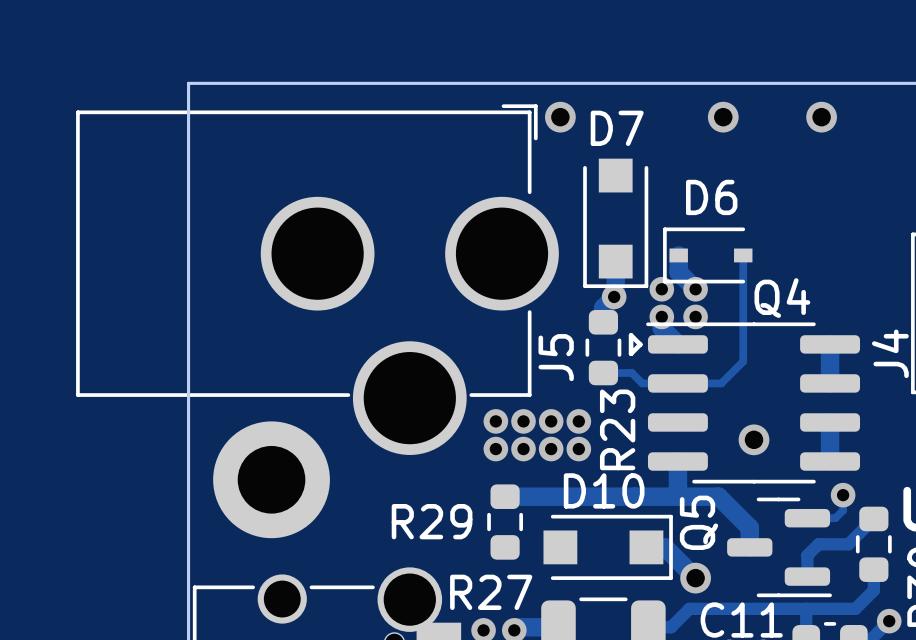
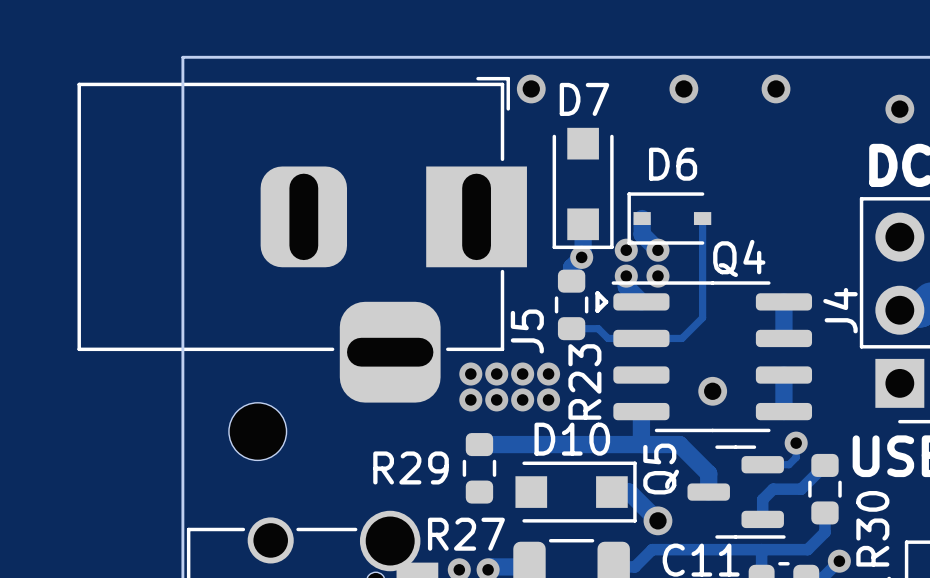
J5 footprint: [76, 104, 559, 455] -> [77, 76, 527, 403]
part footprint: [213, 421, 330, 539] -> [228, 402, 287, 461]

